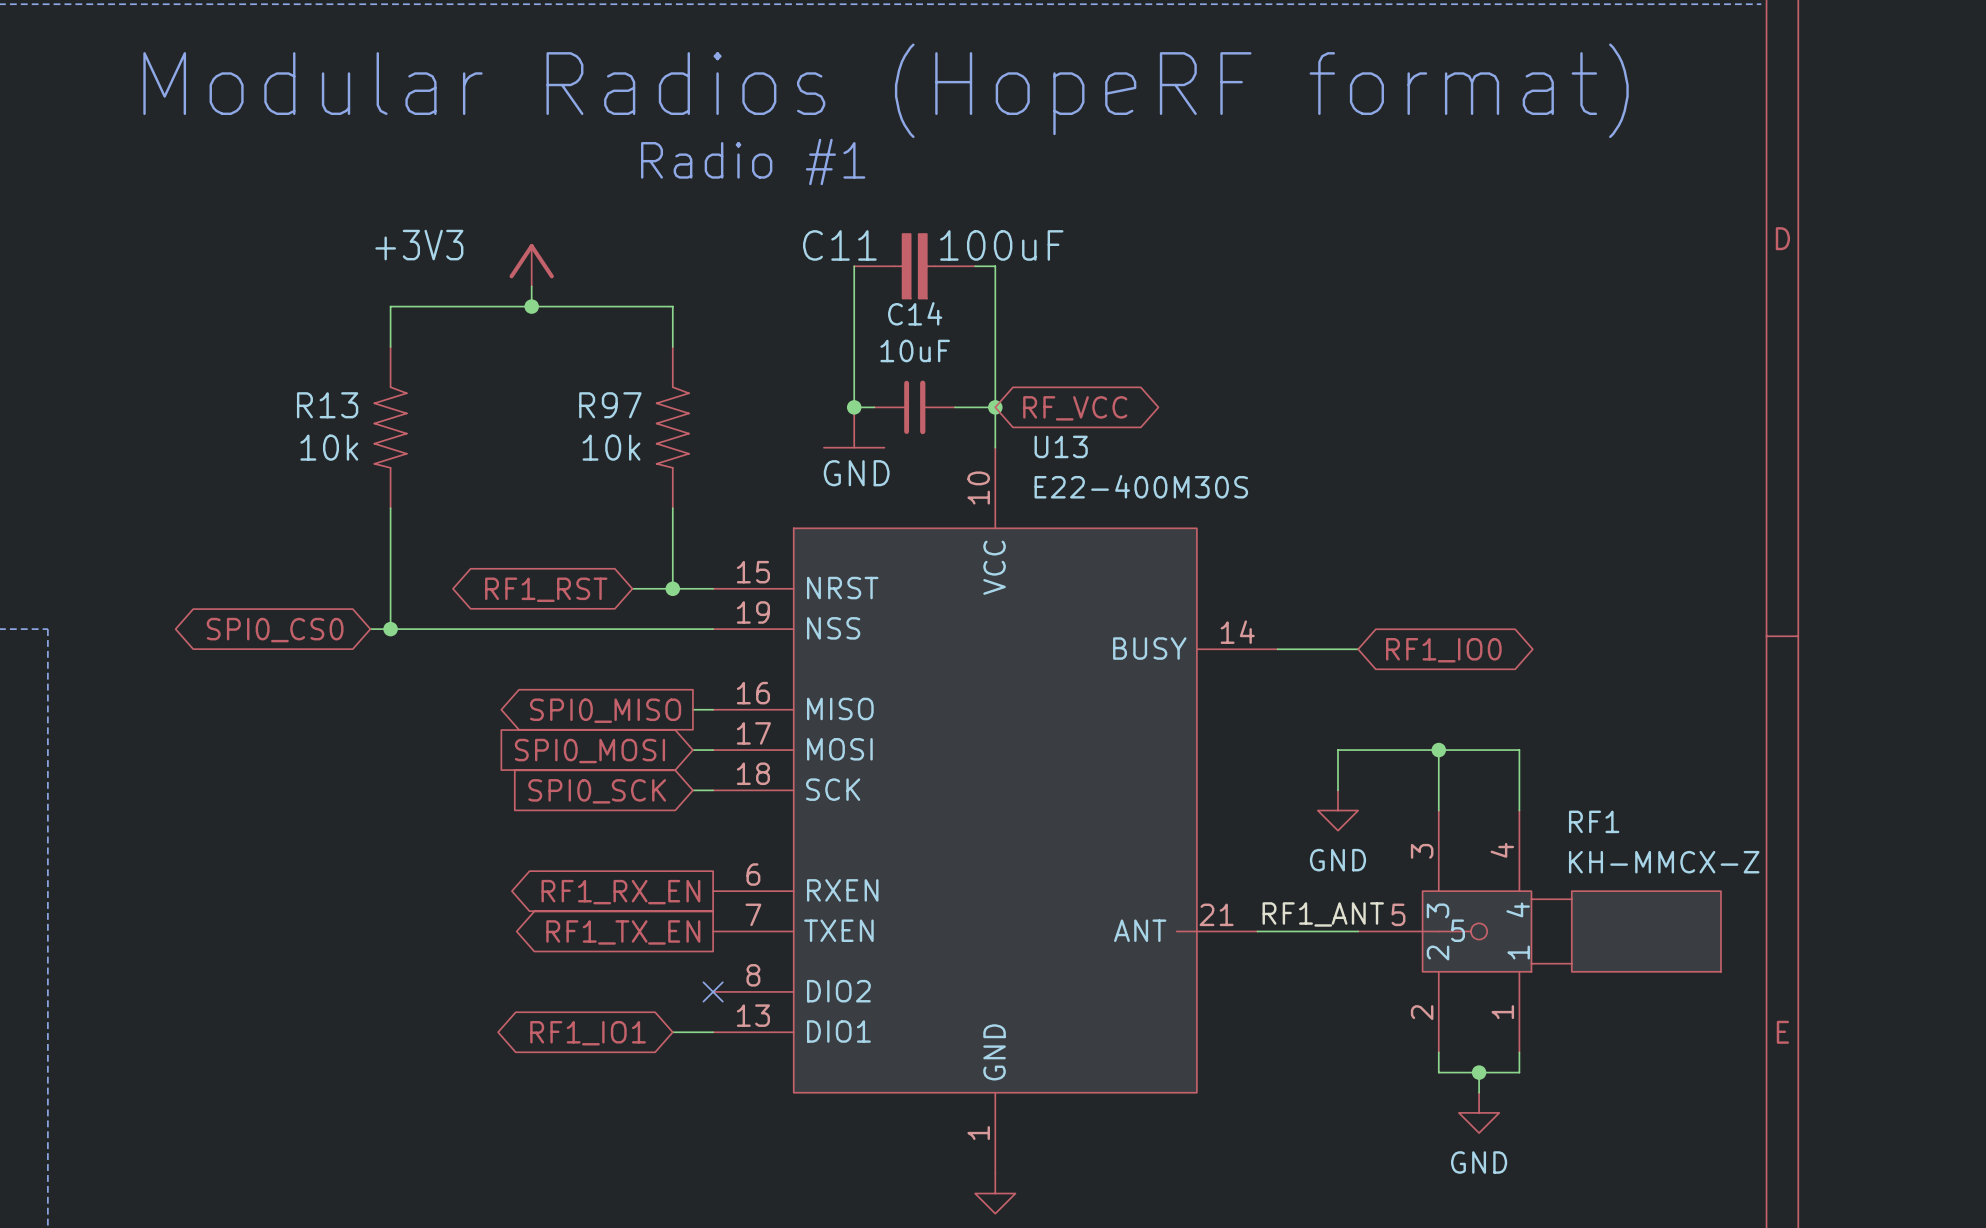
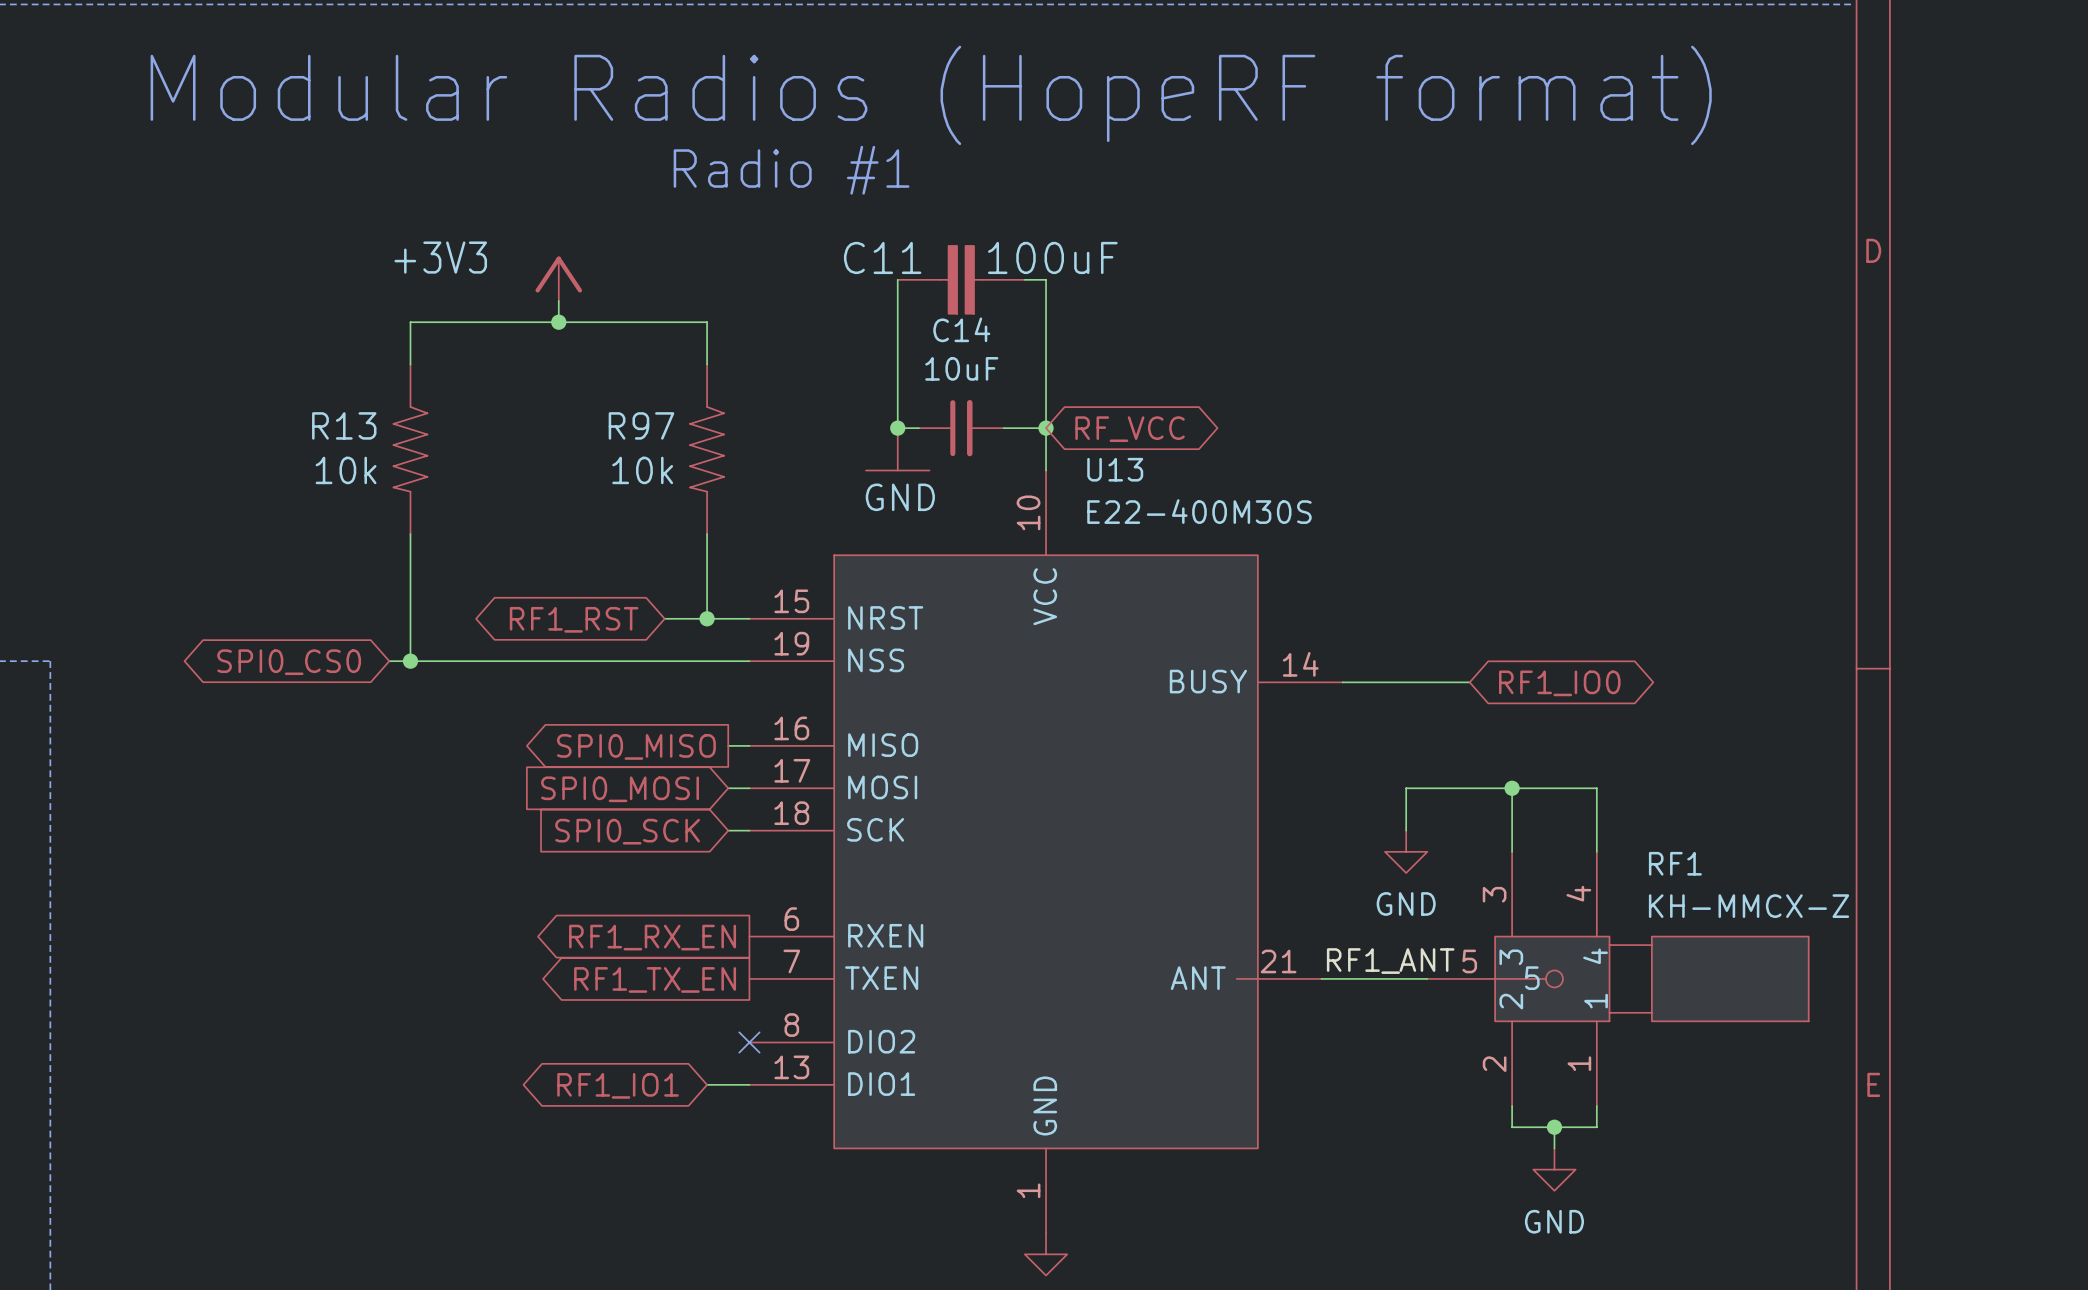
wire: none -> (1427, 682) (1469, 682)
global label position: RF1_IO0 (1443, 650) -> RF1_IO0 (1559, 683)

